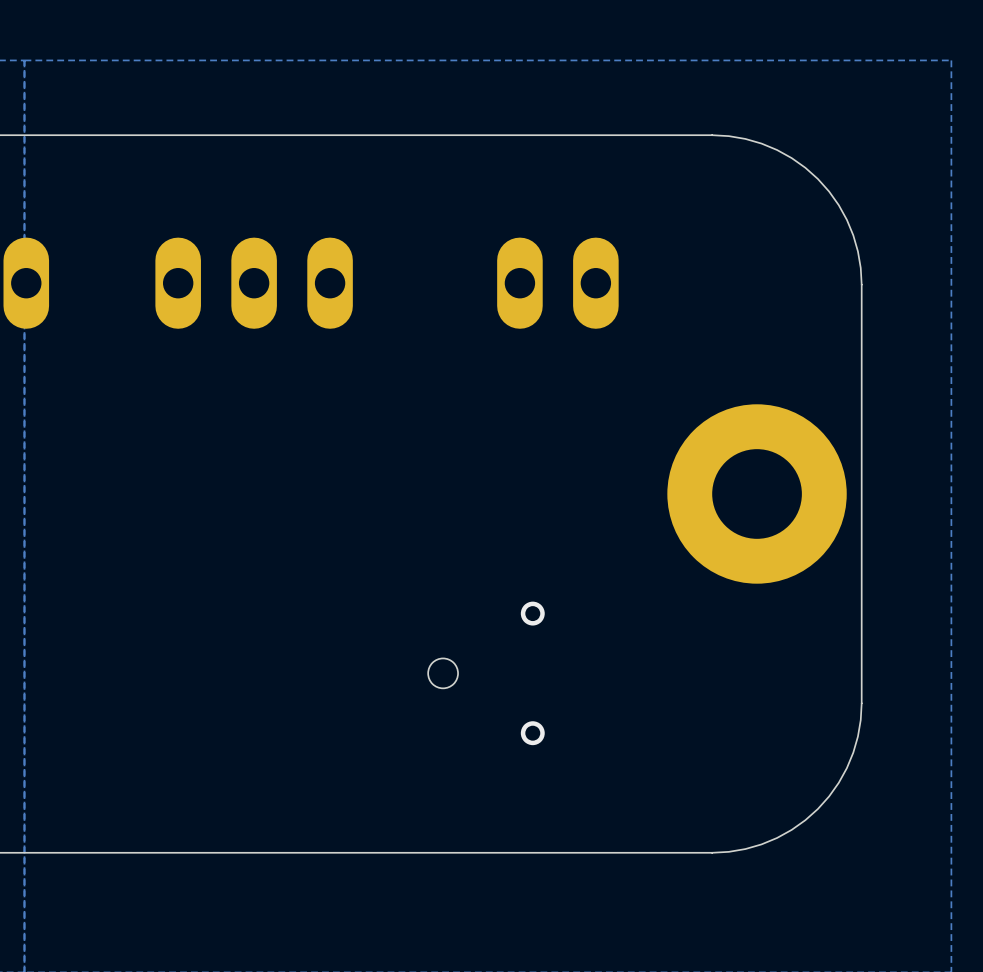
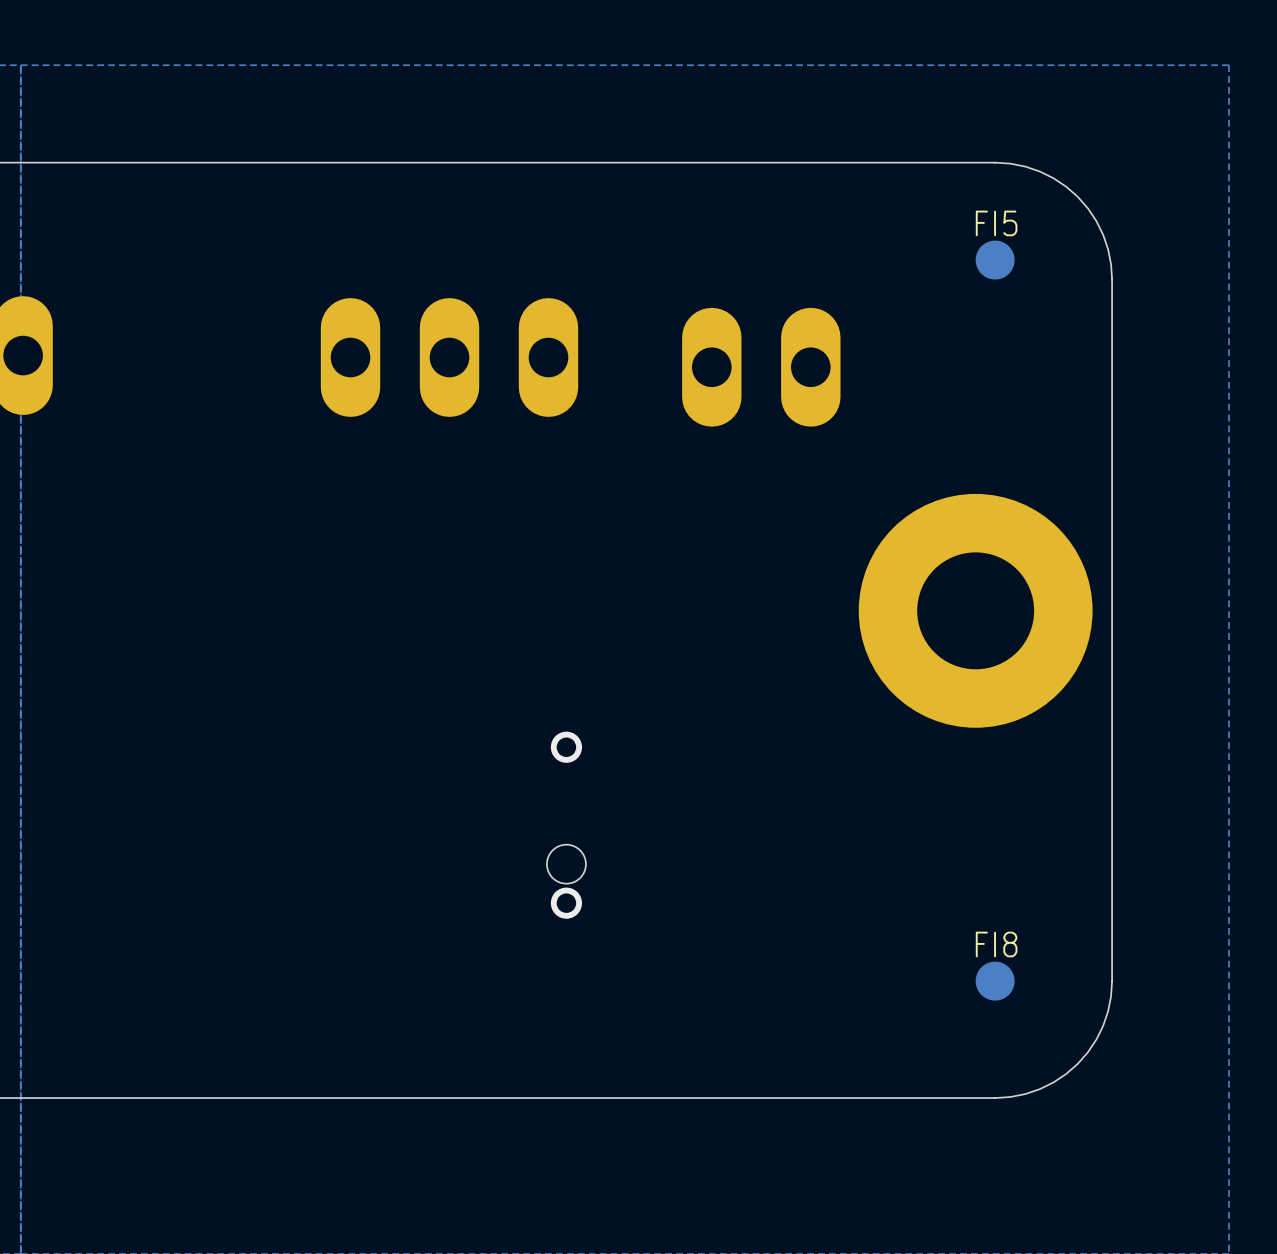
board edge: (712, 135) (728, 136) (761, 143) (791, 158) (817, 178) (838, 205) (853, 235) (860, 267) (861, 284) -> (917, 162) (995, 162) (1025, 166) (1053, 178) (1077, 196) (1096, 221) (1108, 249) (1112, 279) (1112, 357)
FI5: none -> (995, 260)
part position: (254, 283) -> (449, 357)
part position: (557, 283) -> (761, 367)
part position: (757, 493) -> (975, 610)
via: none -> (566, 747)
via: (532, 613) -> none
via: none -> (566, 903)
board edge: (861, 703) (860, 720) (853, 752) (838, 782) (817, 809) (791, 829) (761, 844) (728, 851) (712, 852) -> (1112, 903) (1112, 981) (1108, 1011) (1096, 1039) (1077, 1063) (1053, 1082) (1025, 1094) (995, 1098) (917, 1098)
via: (532, 733) -> none
FI8: none -> (995, 981)

